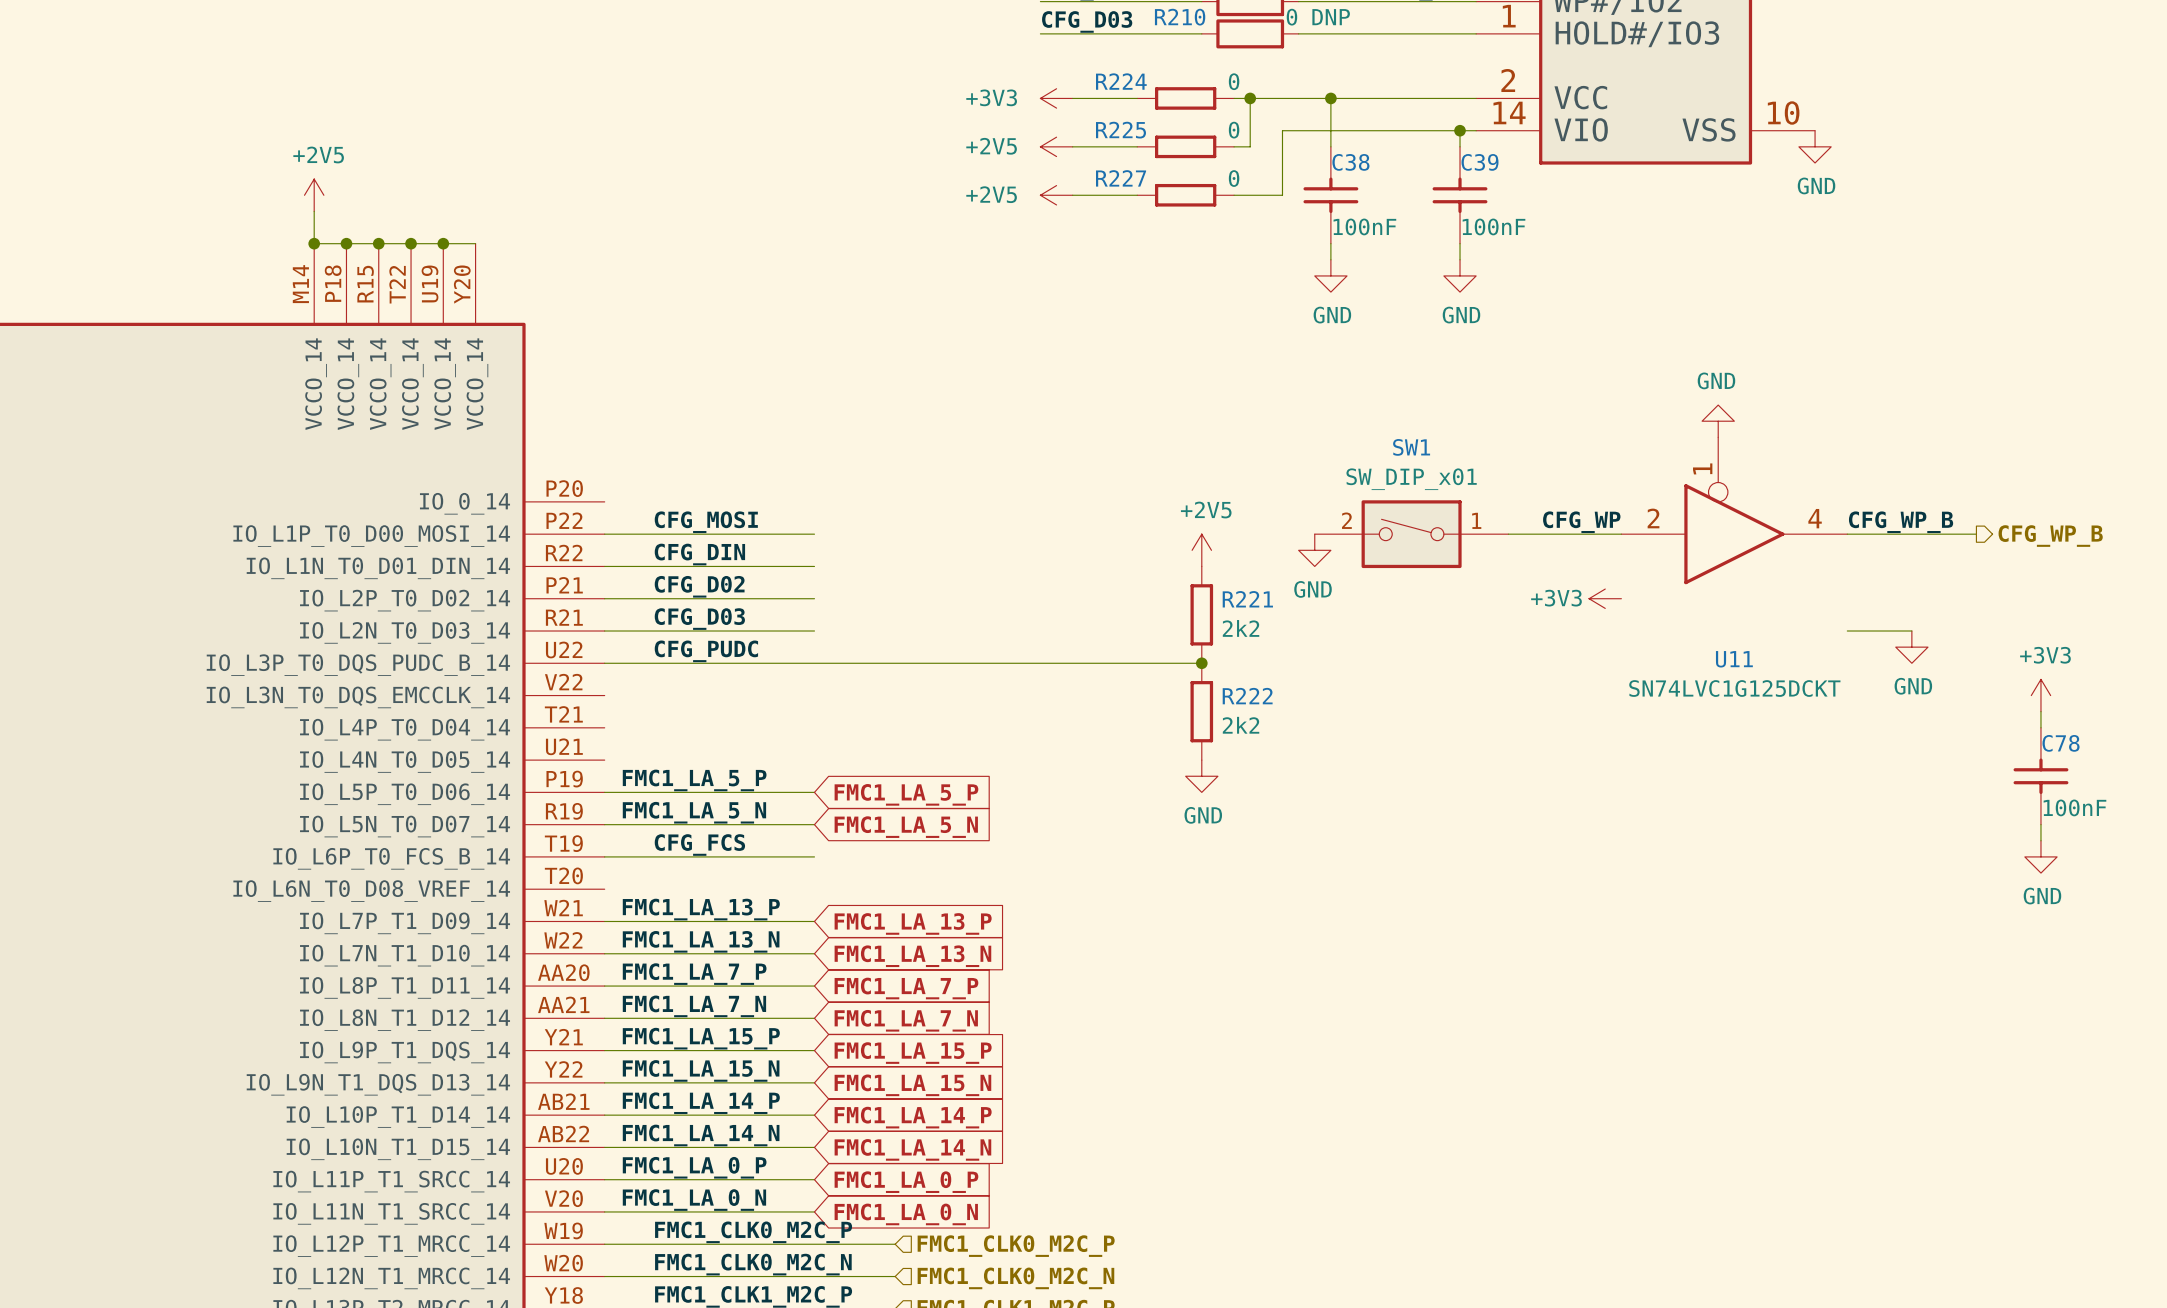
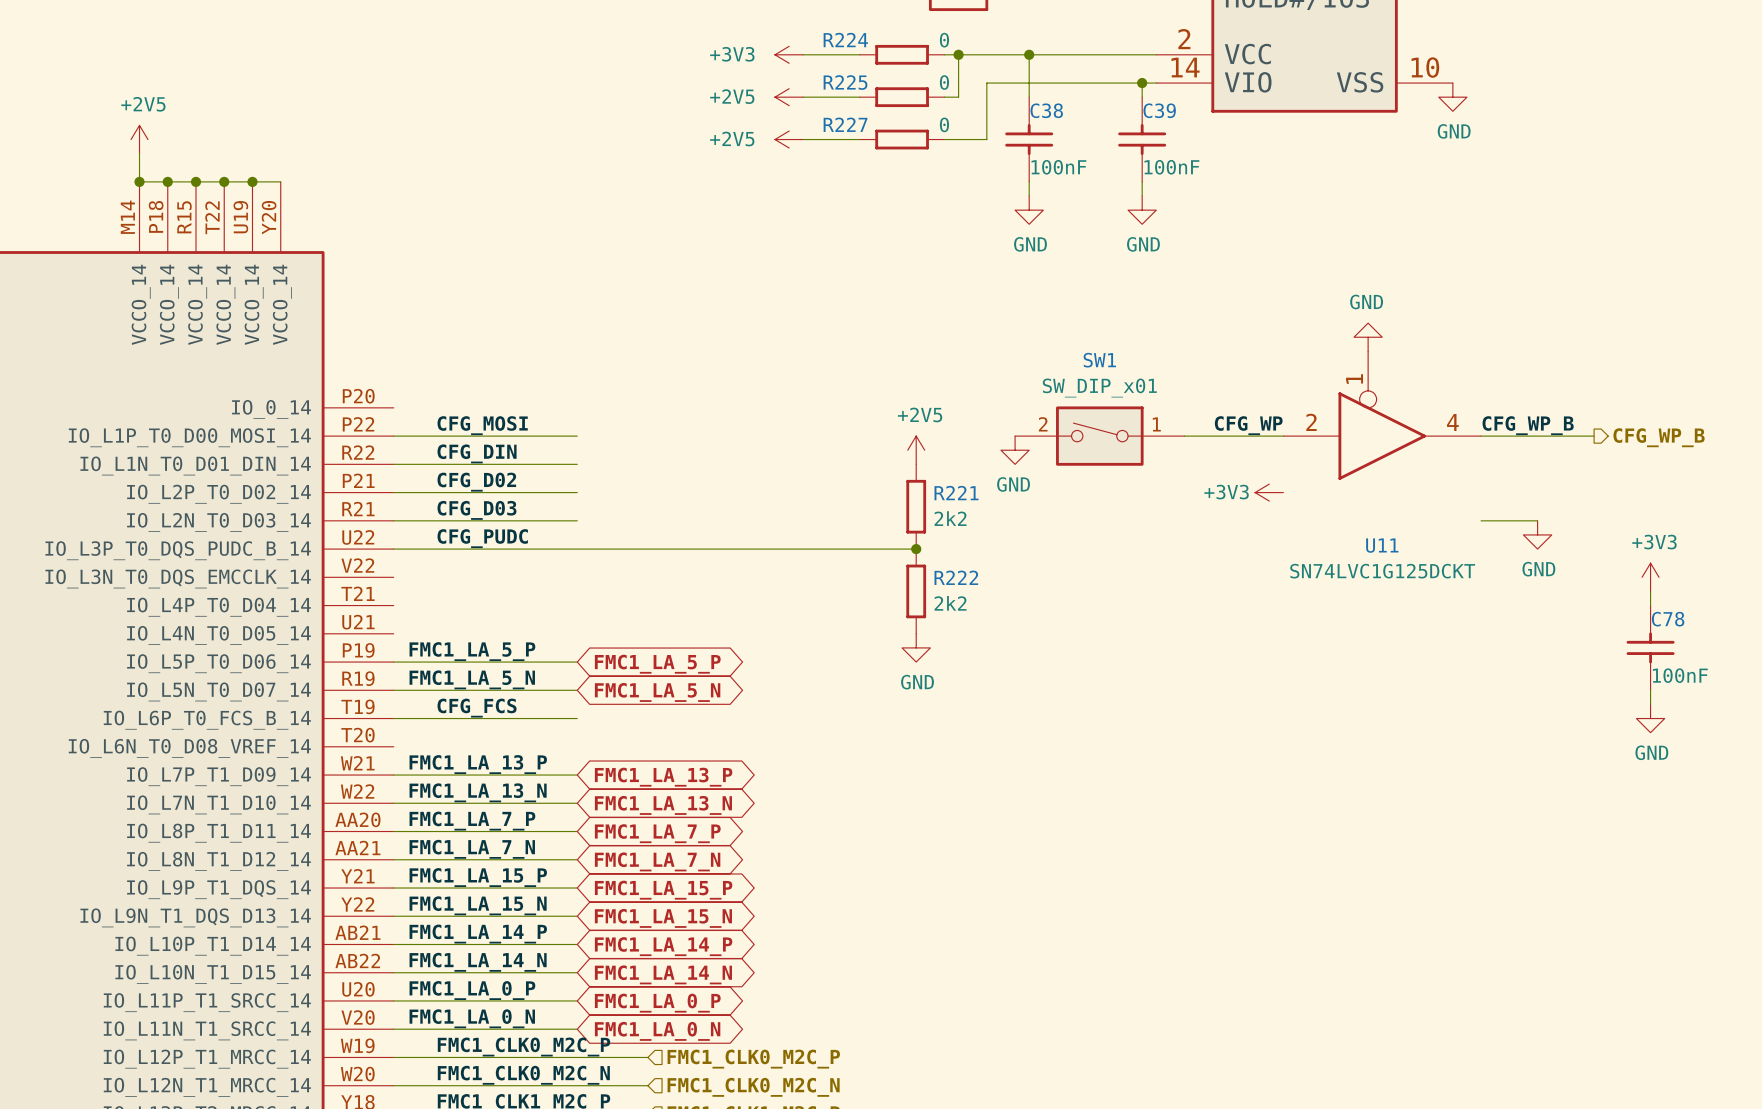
global label shape: input (906, 794) -> bidirectional (657, 664)
global label shape: input (906, 827) -> bidirectional (657, 692)
global label shape: input (913, 923) -> bidirectional (663, 777)
global label shape: input (912, 956) -> bidirectional (663, 805)
global label shape: input (906, 988) -> bidirectional (657, 833)
global label shape: input (906, 1020) -> bidirectional (657, 861)
global label shape: input (913, 1053) -> bidirectional (663, 890)
global label shape: input (912, 1085) -> bidirectional (663, 918)
global label shape: input (913, 1117) -> bidirectional (663, 946)
global label shape: input (912, 1149) -> bidirectional (663, 974)
global label shape: input (906, 1182) -> bidirectional (657, 1003)
global label shape: input (906, 1214) -> bidirectional (657, 1031)

